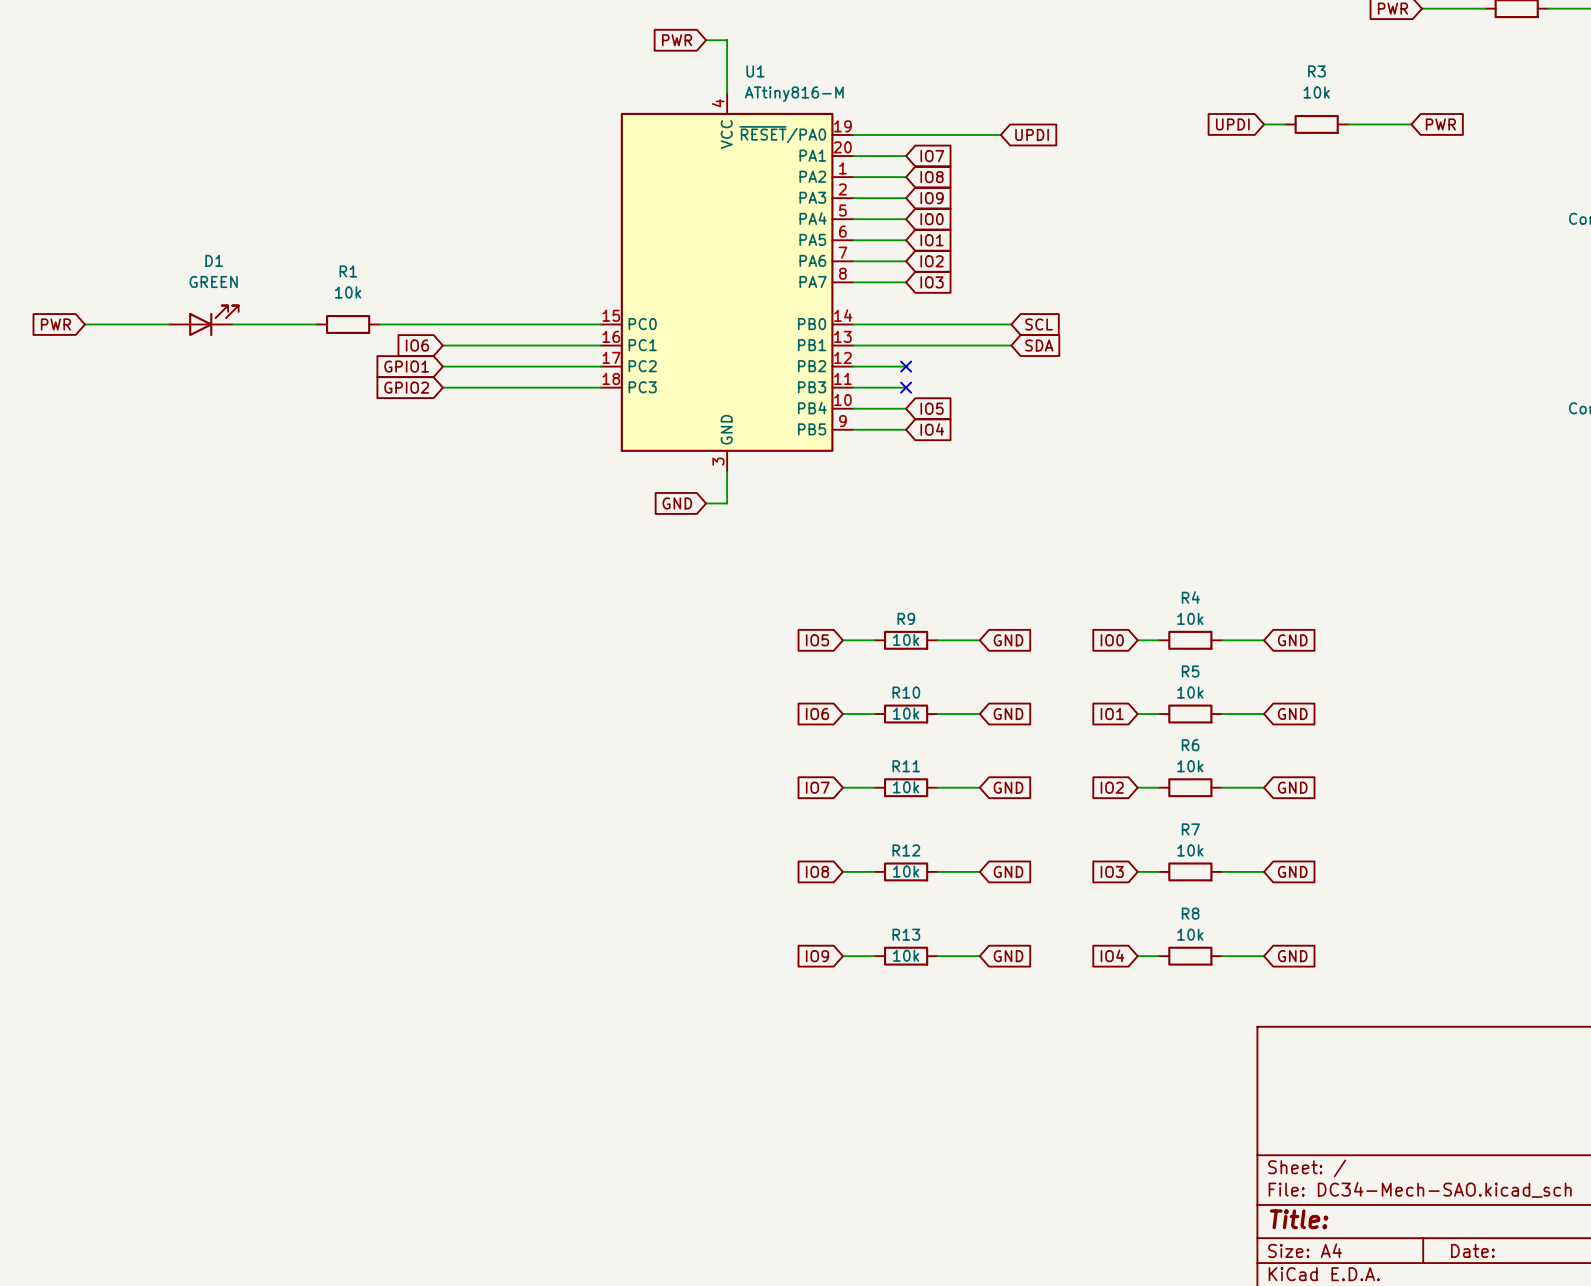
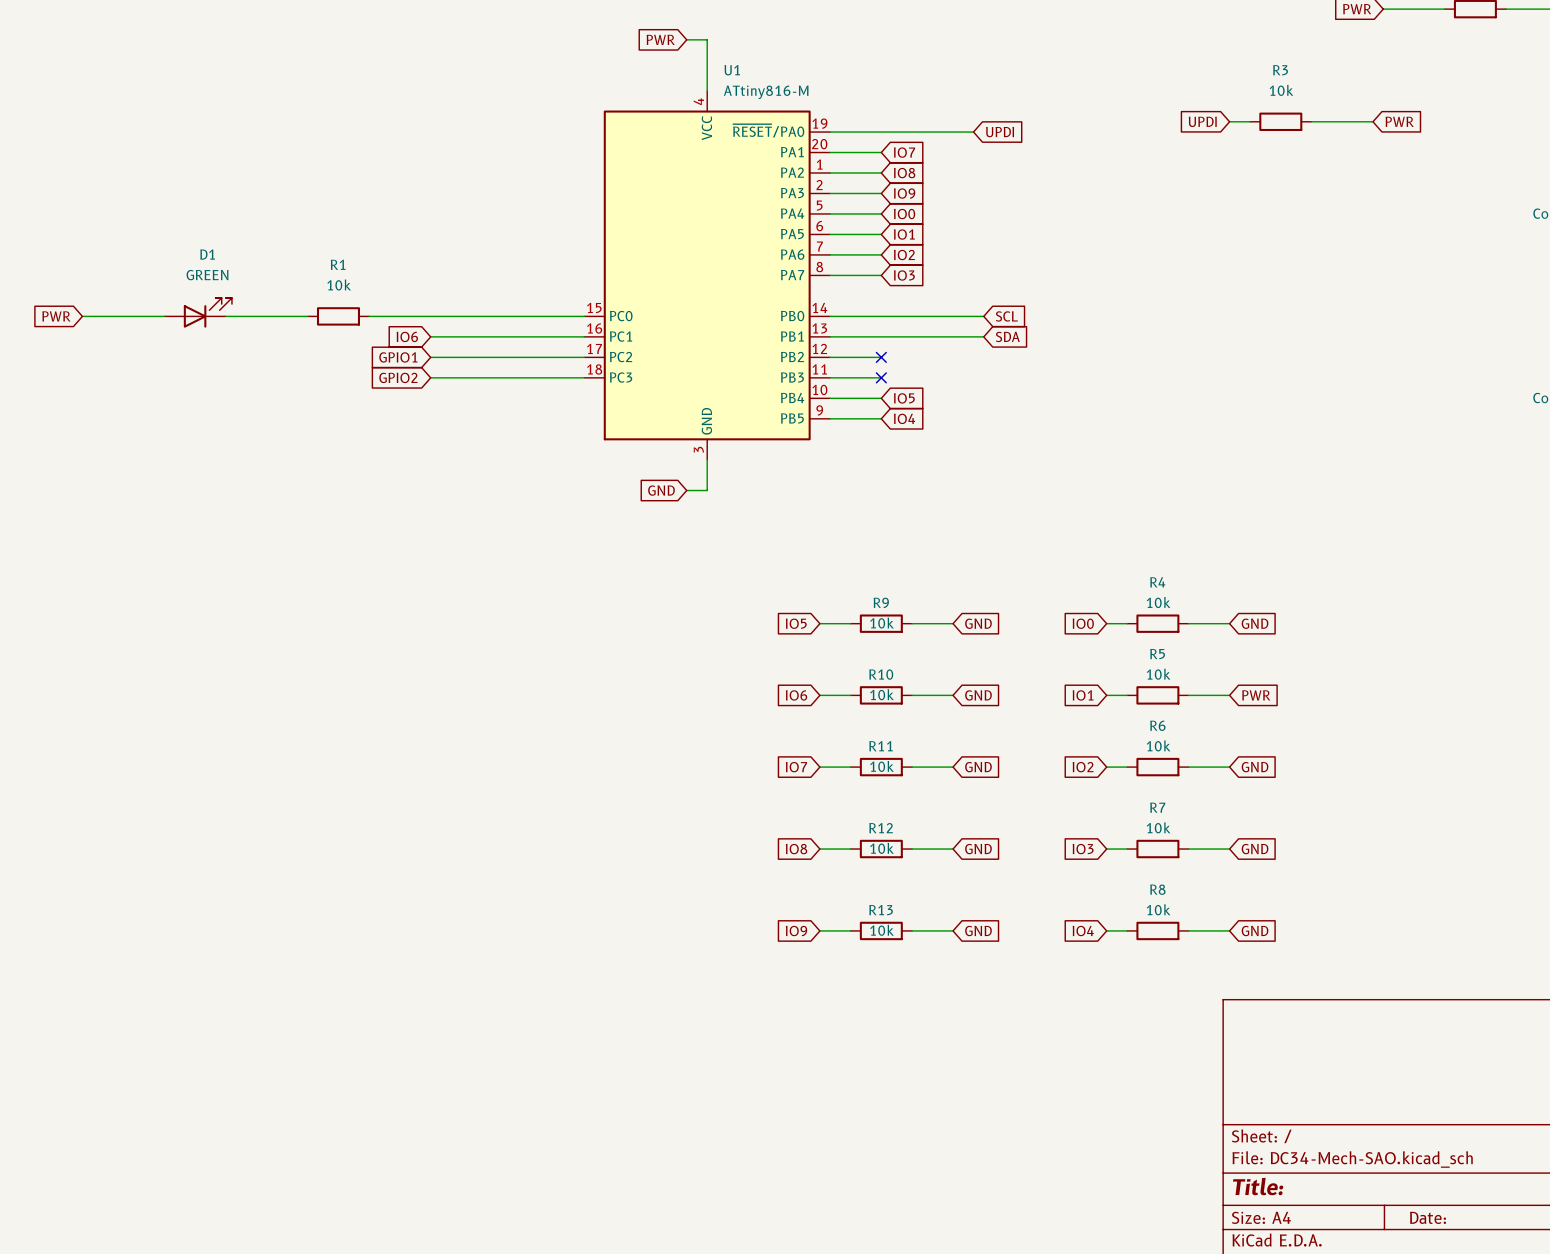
global label: GND (1292, 714) -> PWR (1256, 695)

